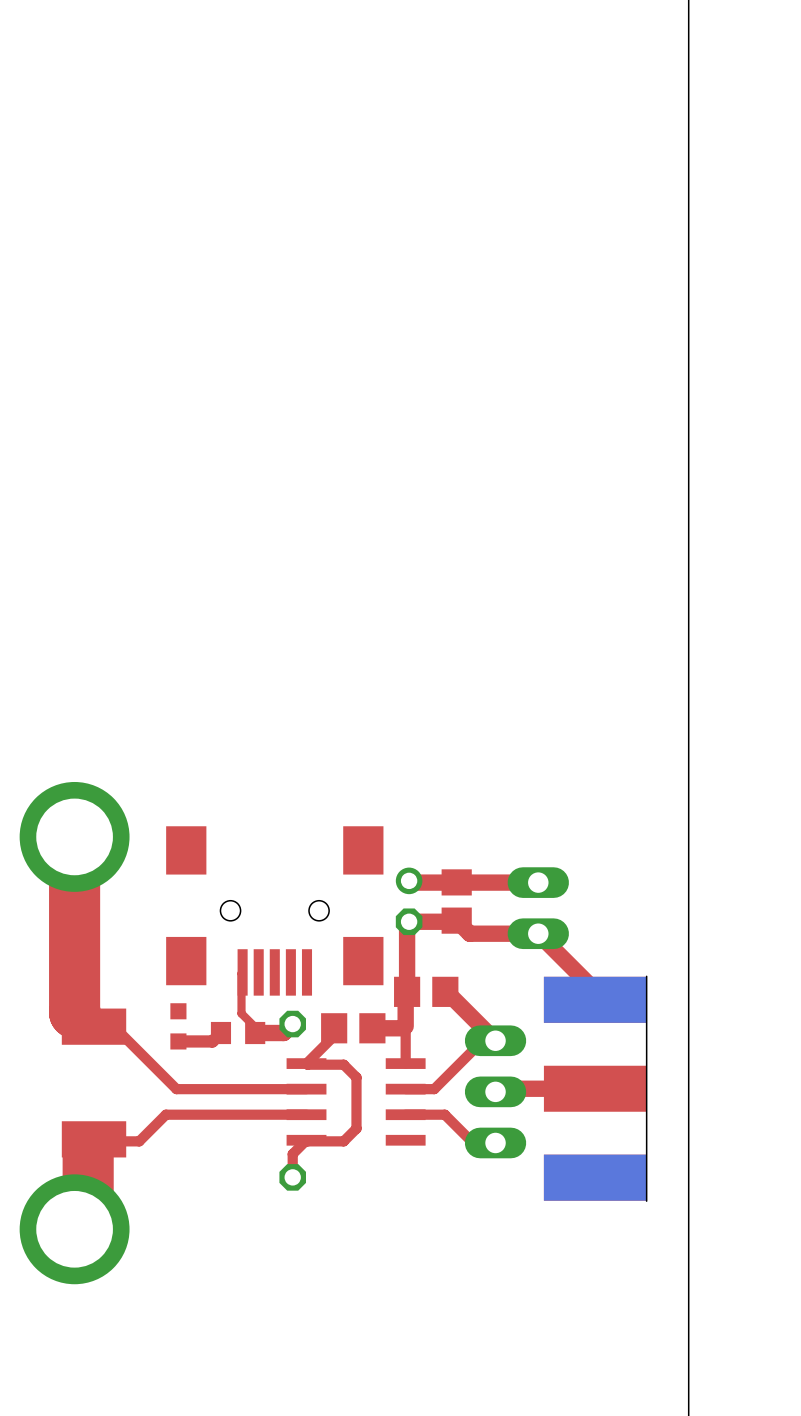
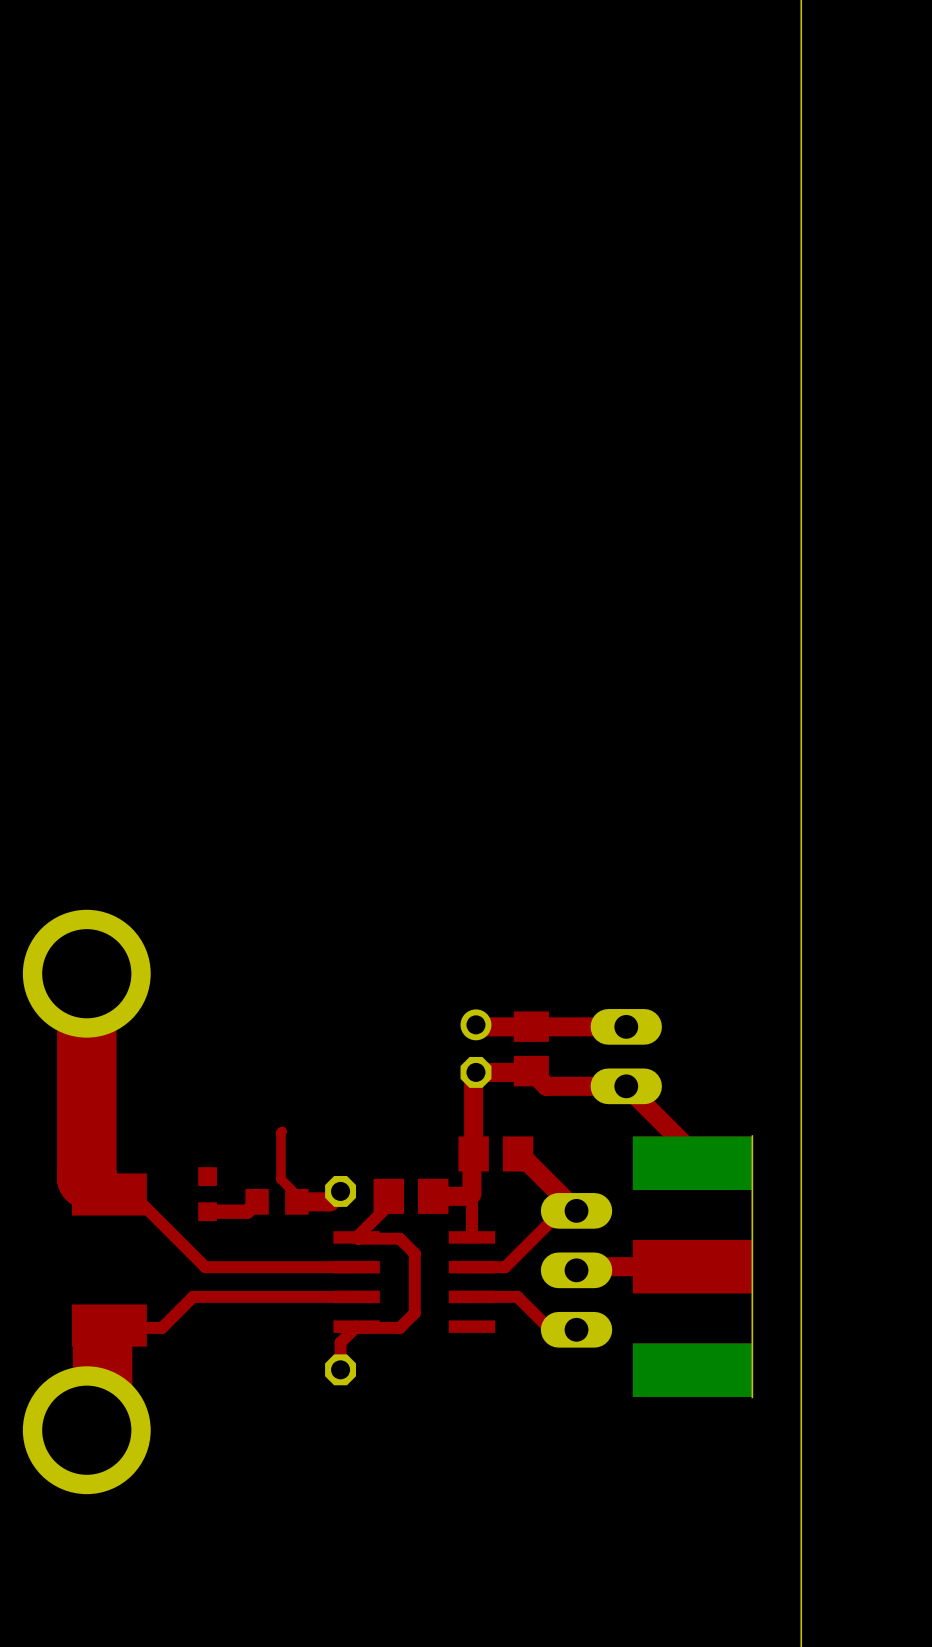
part: (274, 910) -> none

